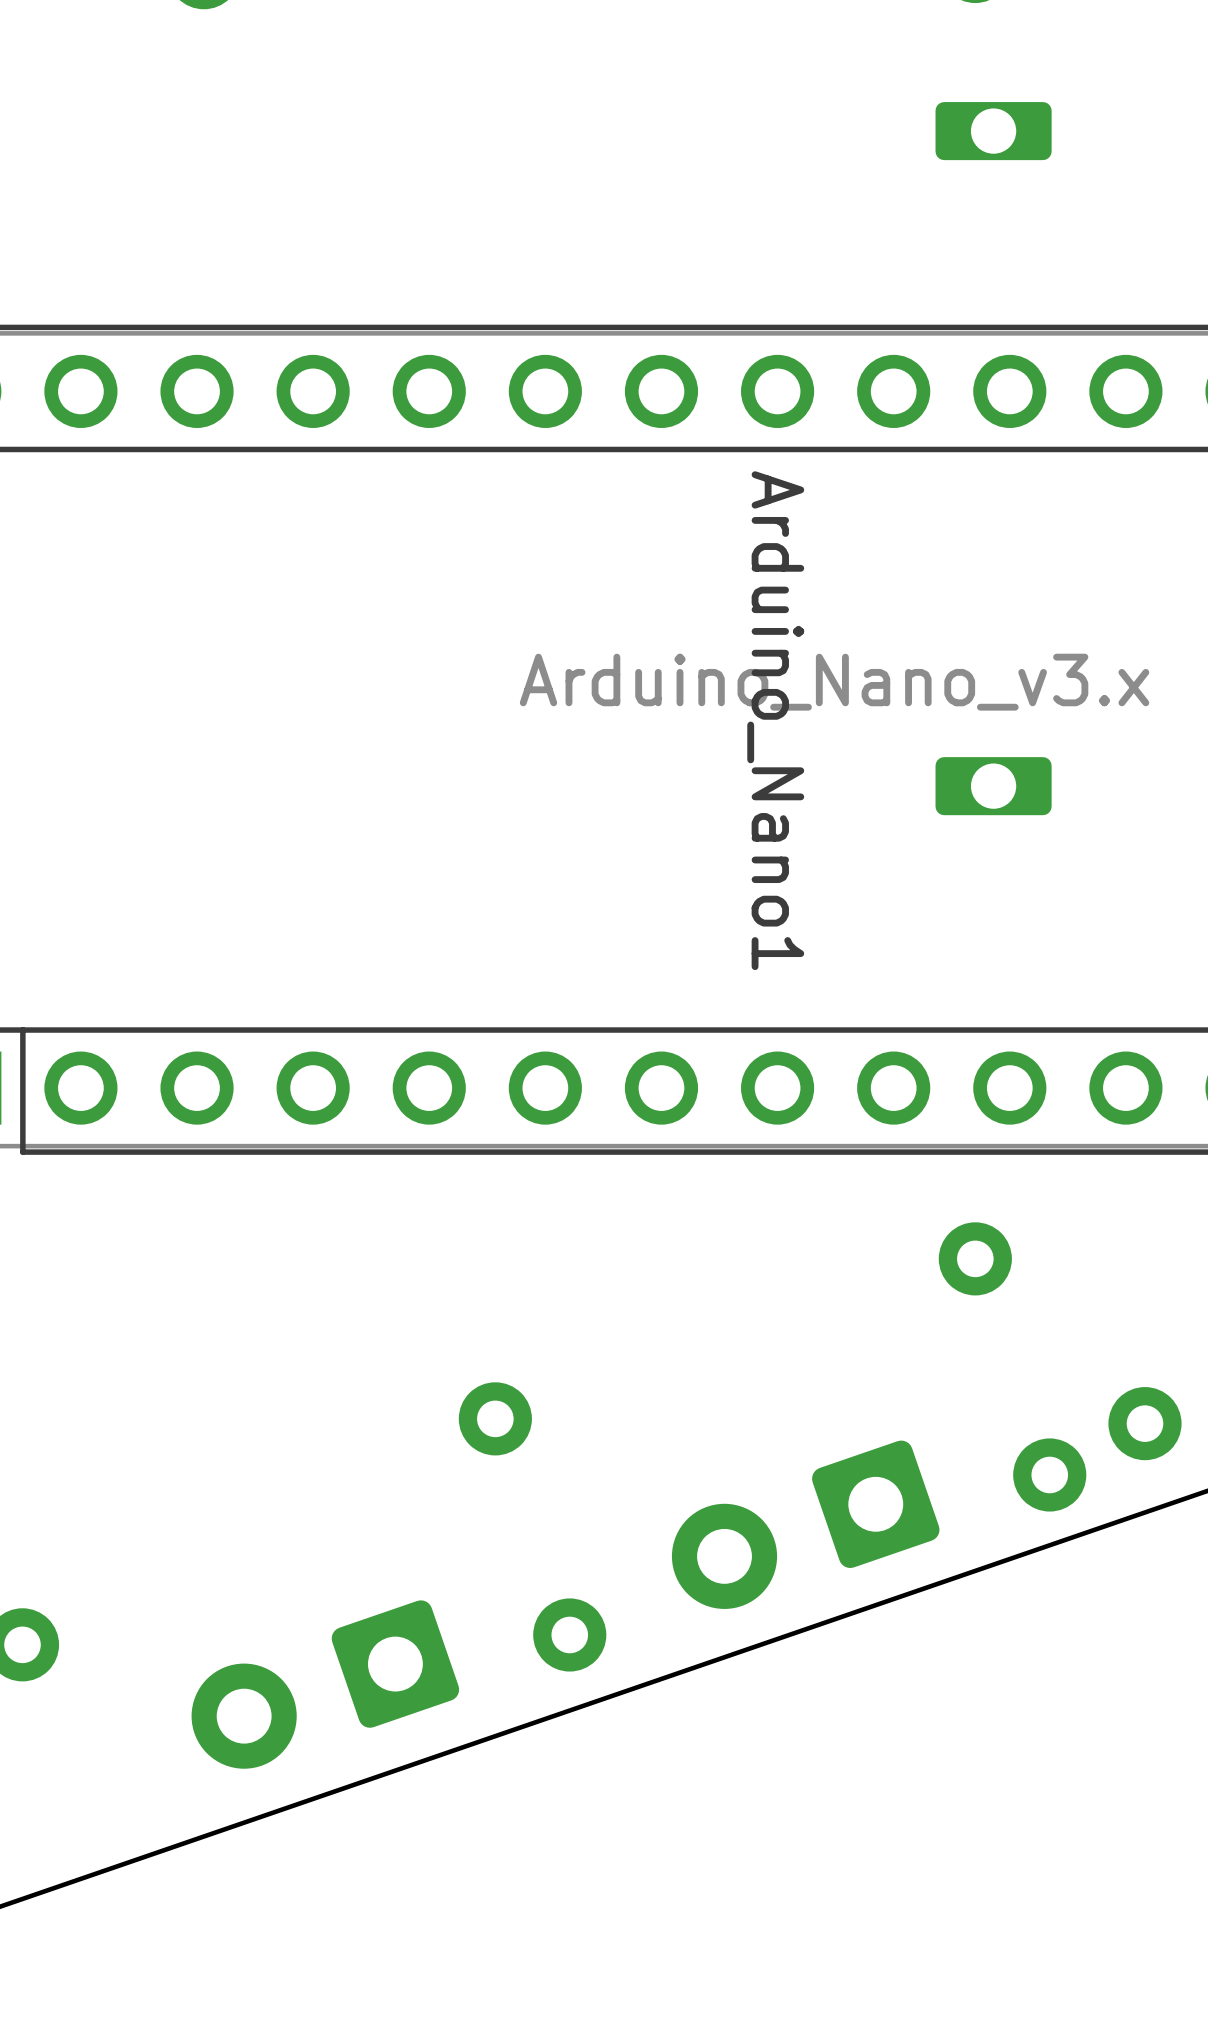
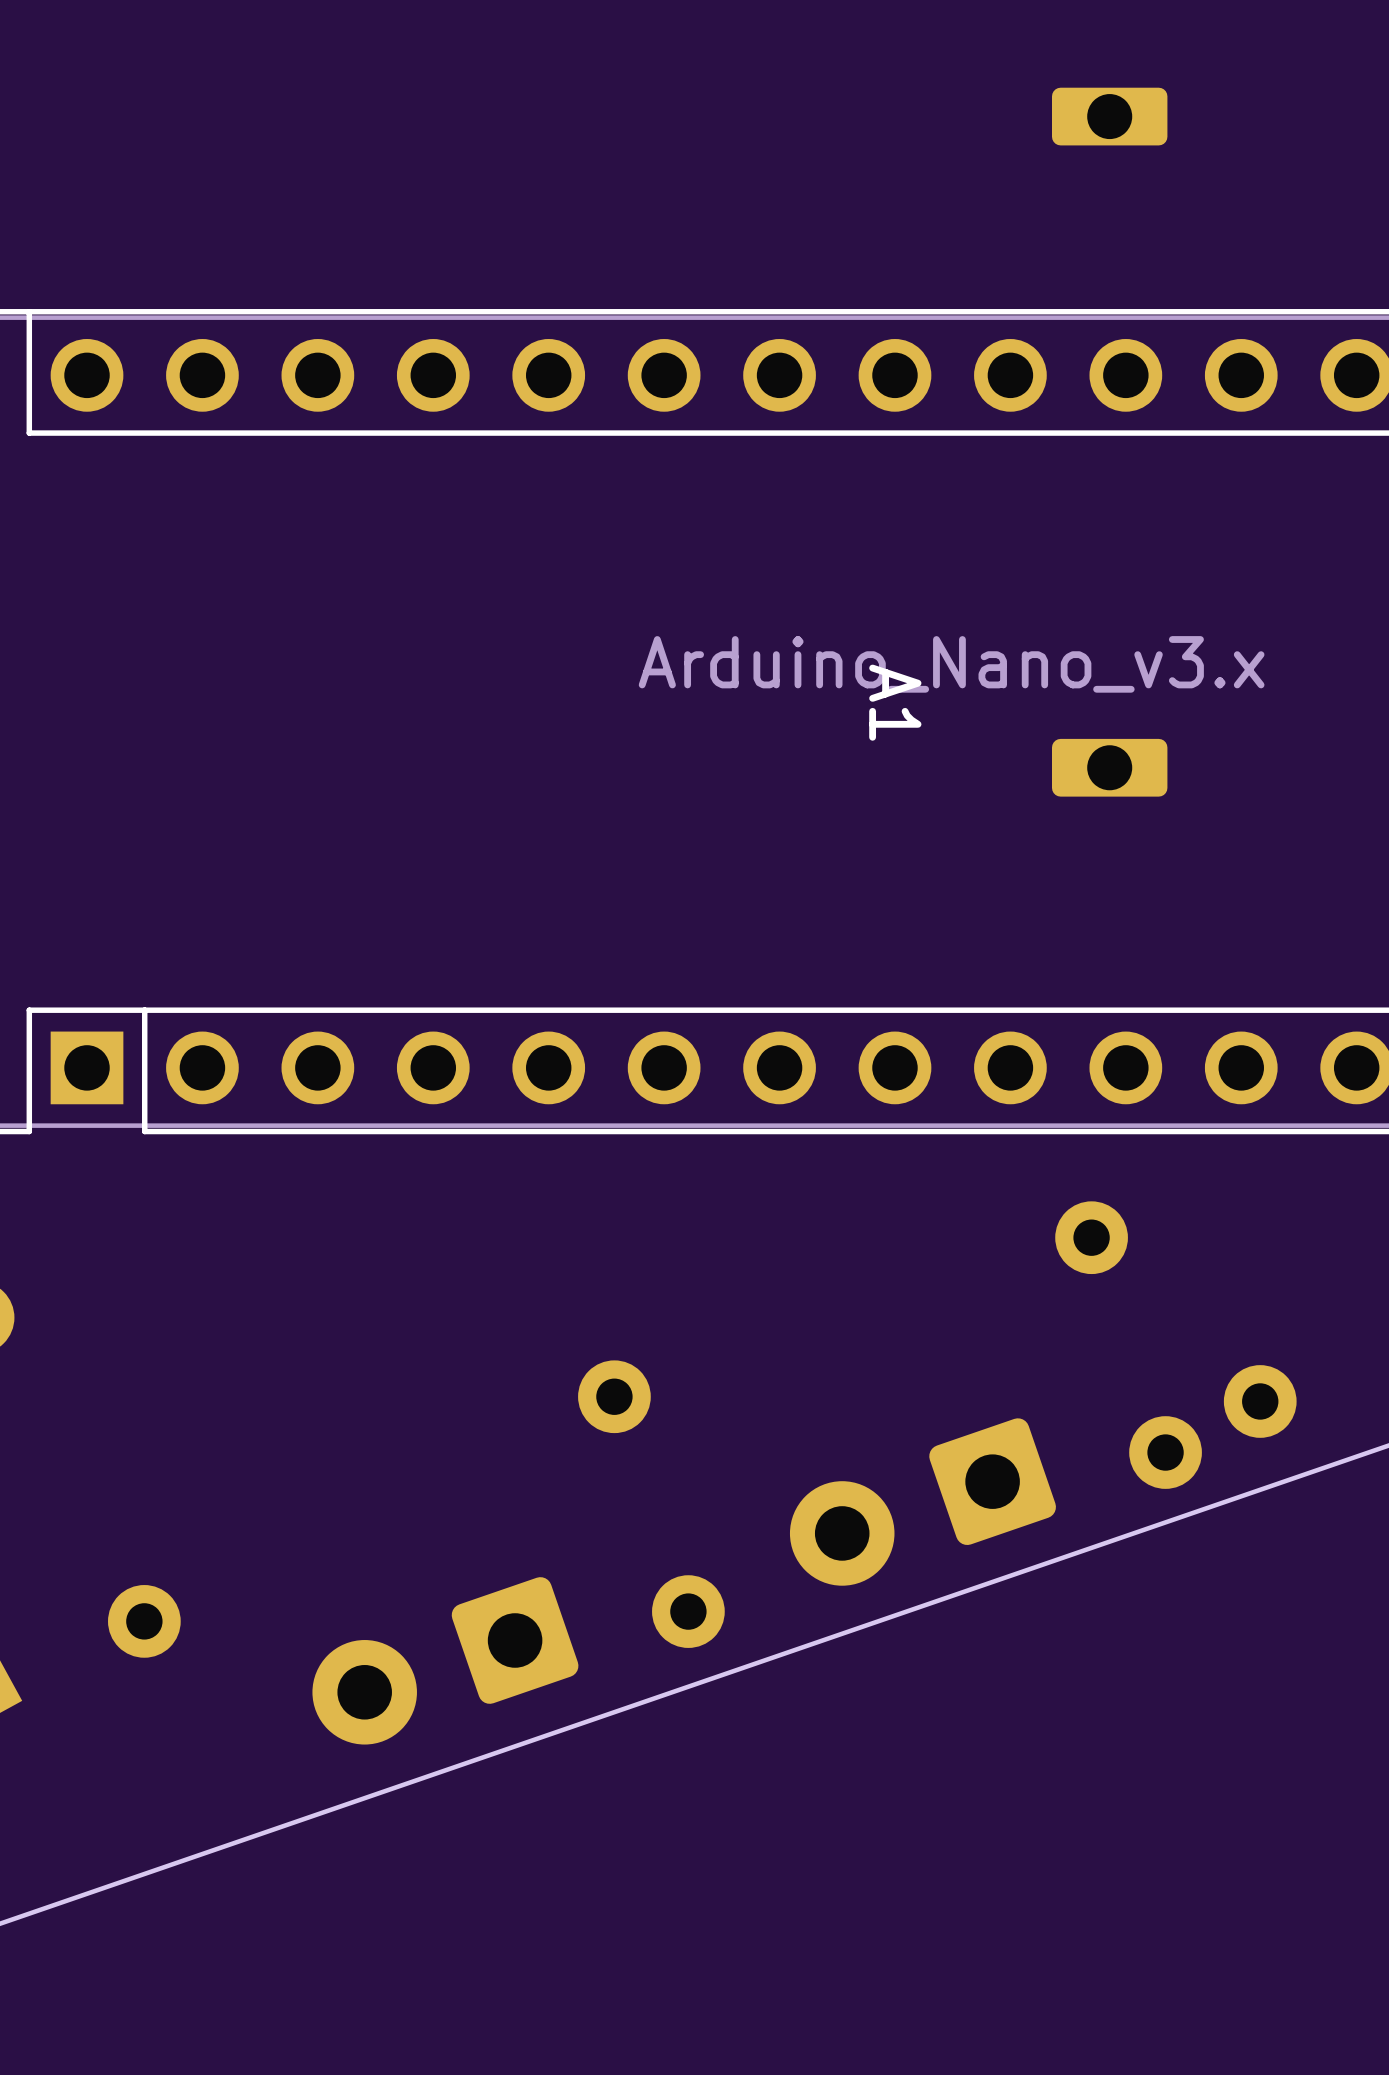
Arduino_Nano1 name: Arduino_Nano1 (775, 720) -> A1 (895, 702)

